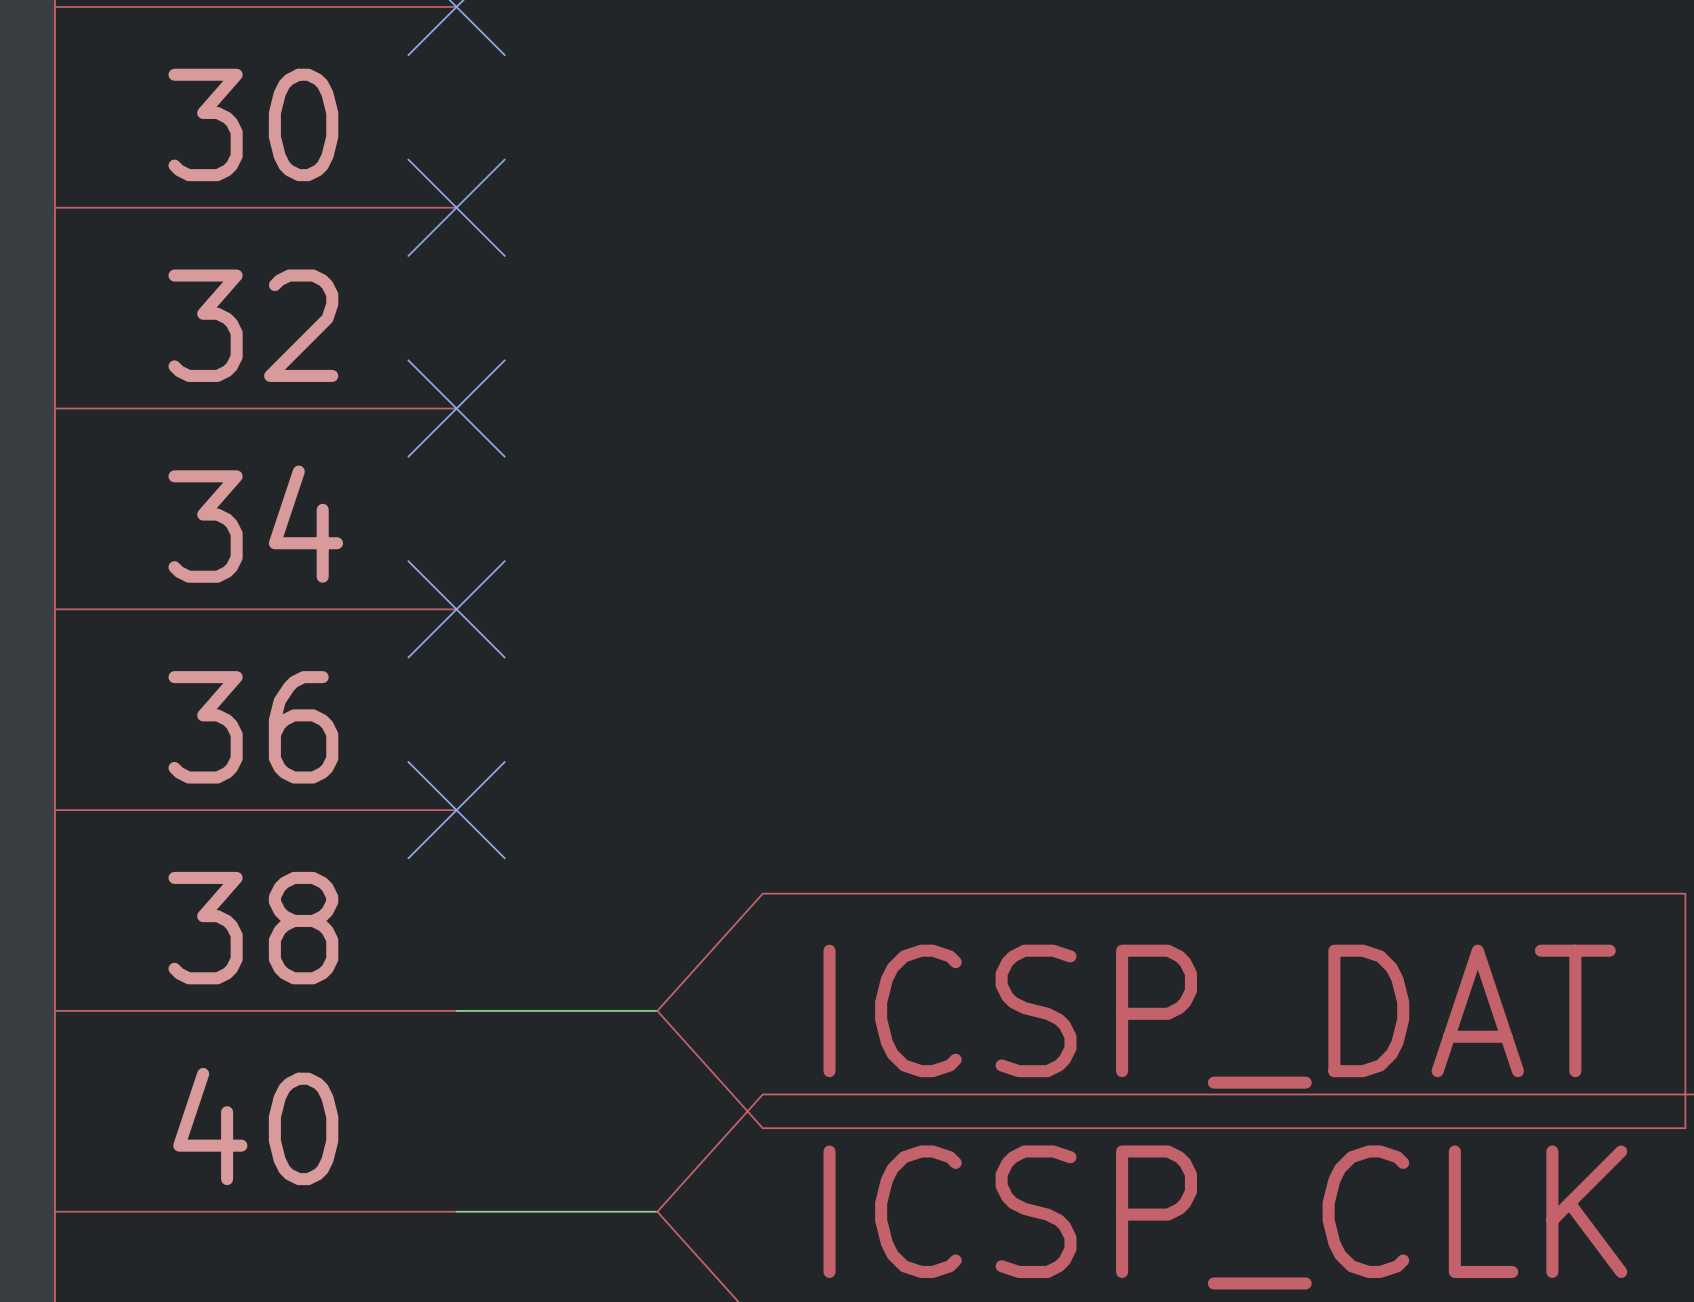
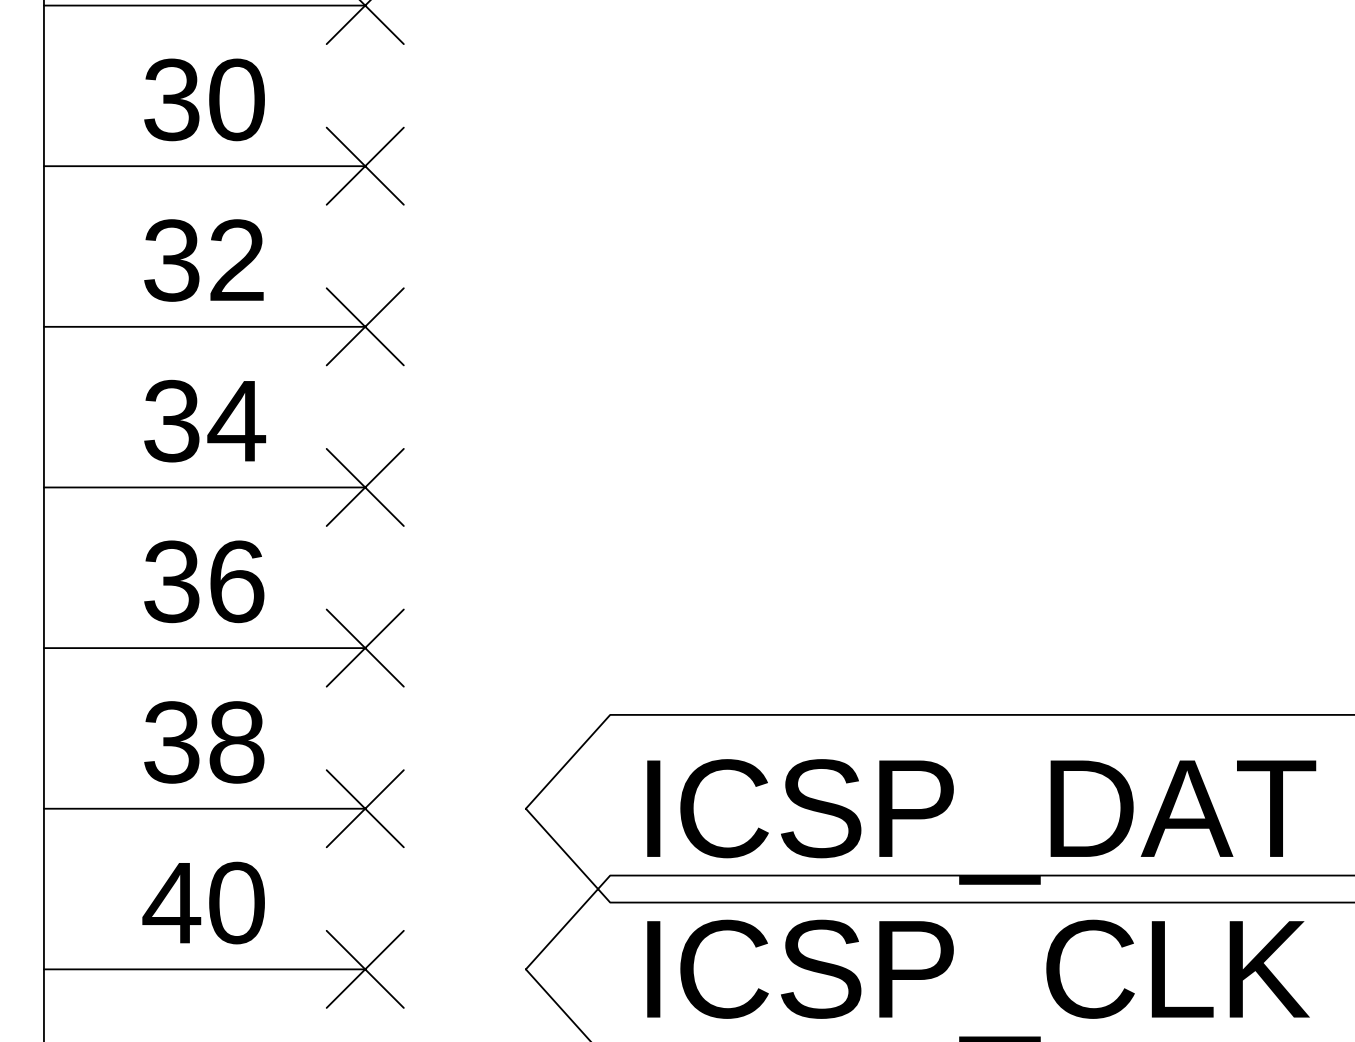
wire: (456, 1010) (657, 1010) -> none
no-connect mark: none -> (365, 808)
wire: (456, 1211) (657, 1211) -> none
no-connect mark: none -> (365, 969)

